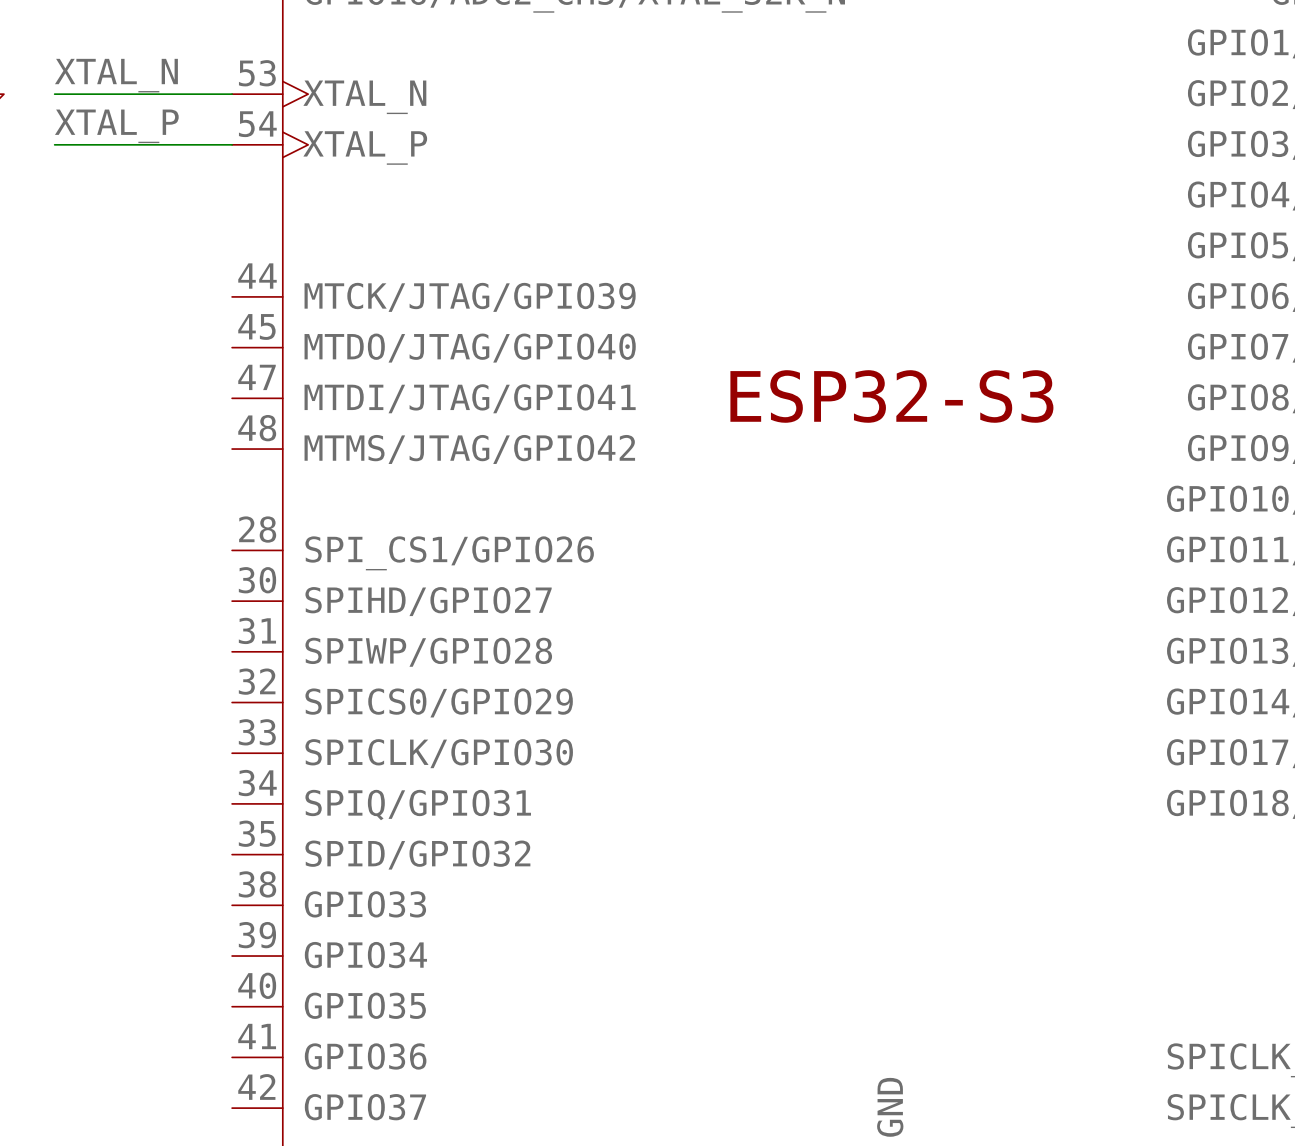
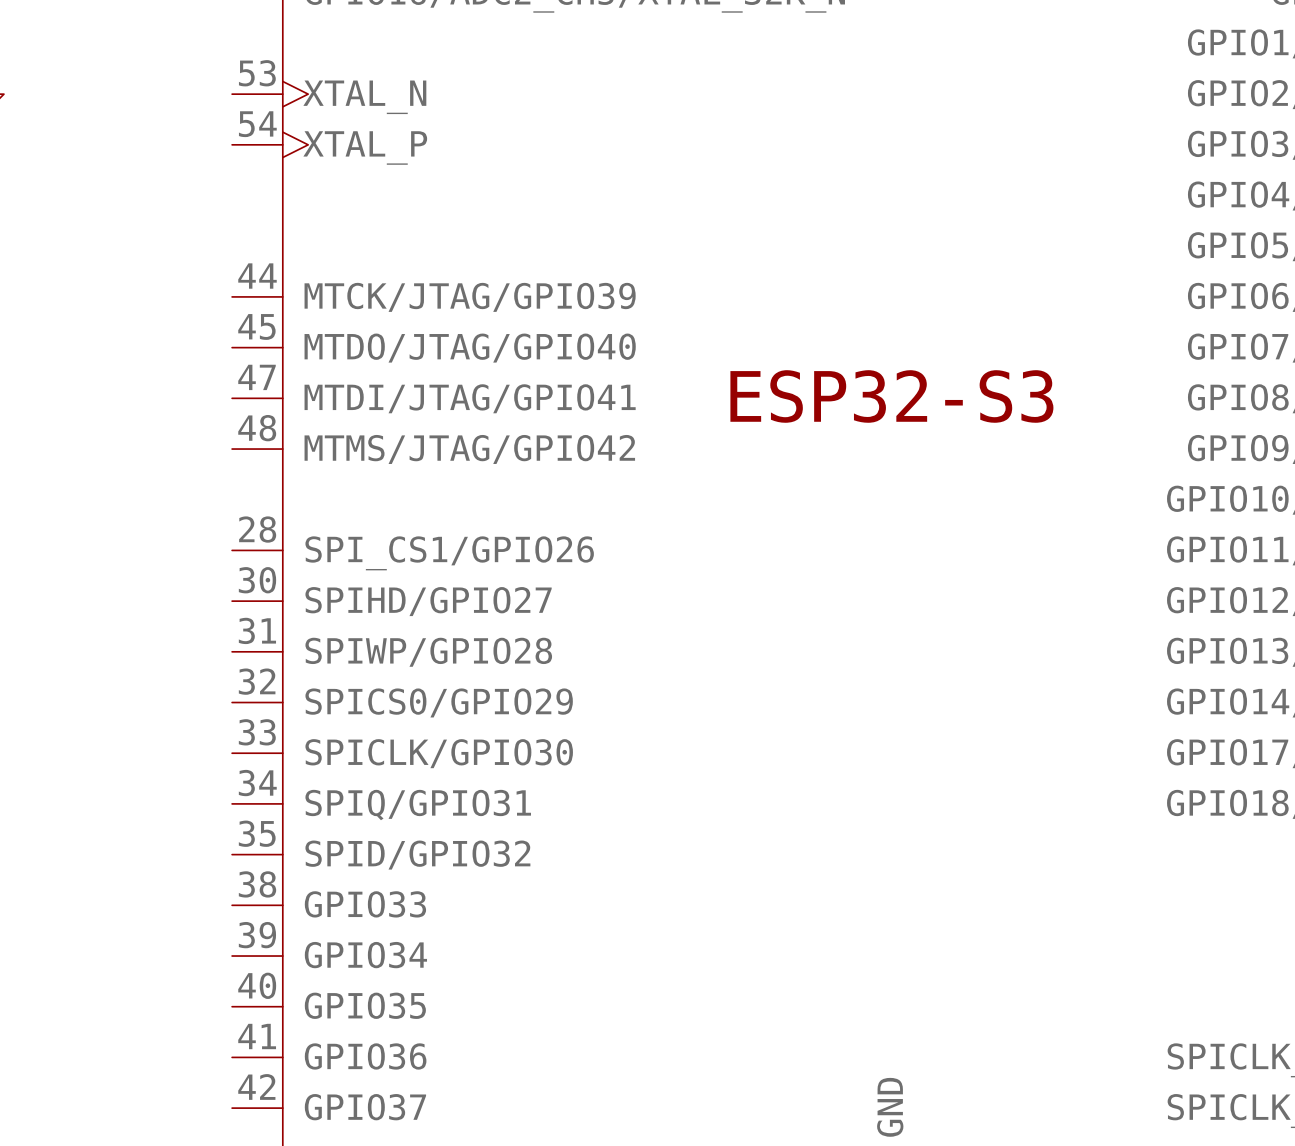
label: XTAL_N (116, 75) -> none
wire: (54, 94) (232, 94) -> none
label: XTAL_P (116, 126) -> none
wire: (54, 144) (232, 144) -> none

